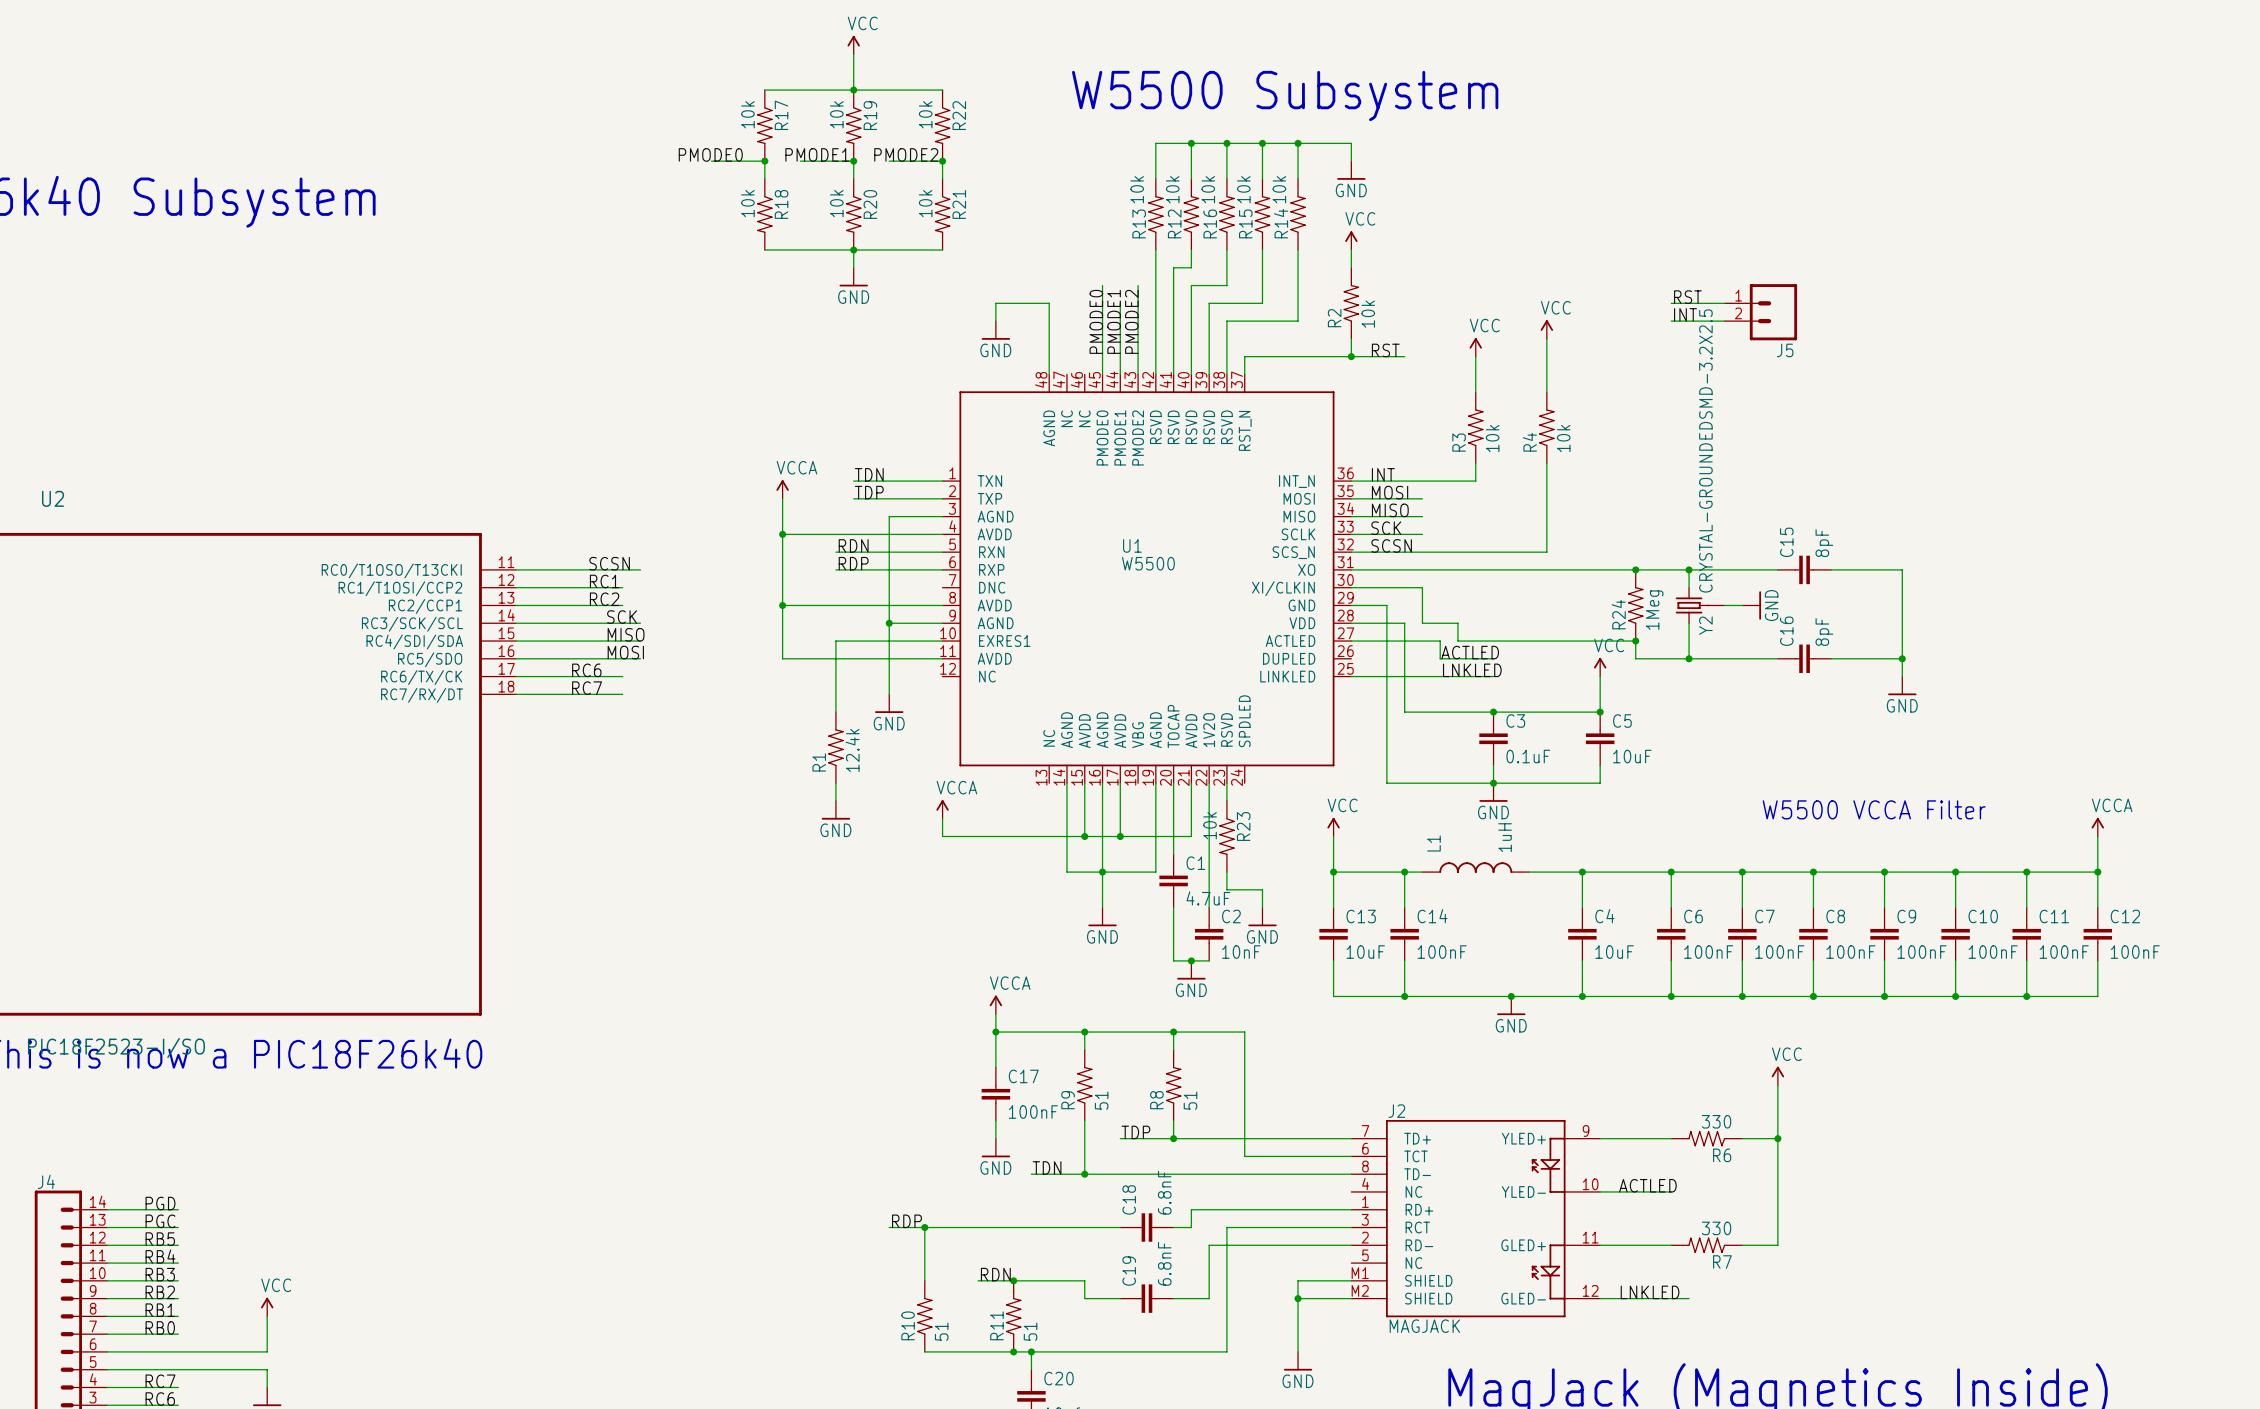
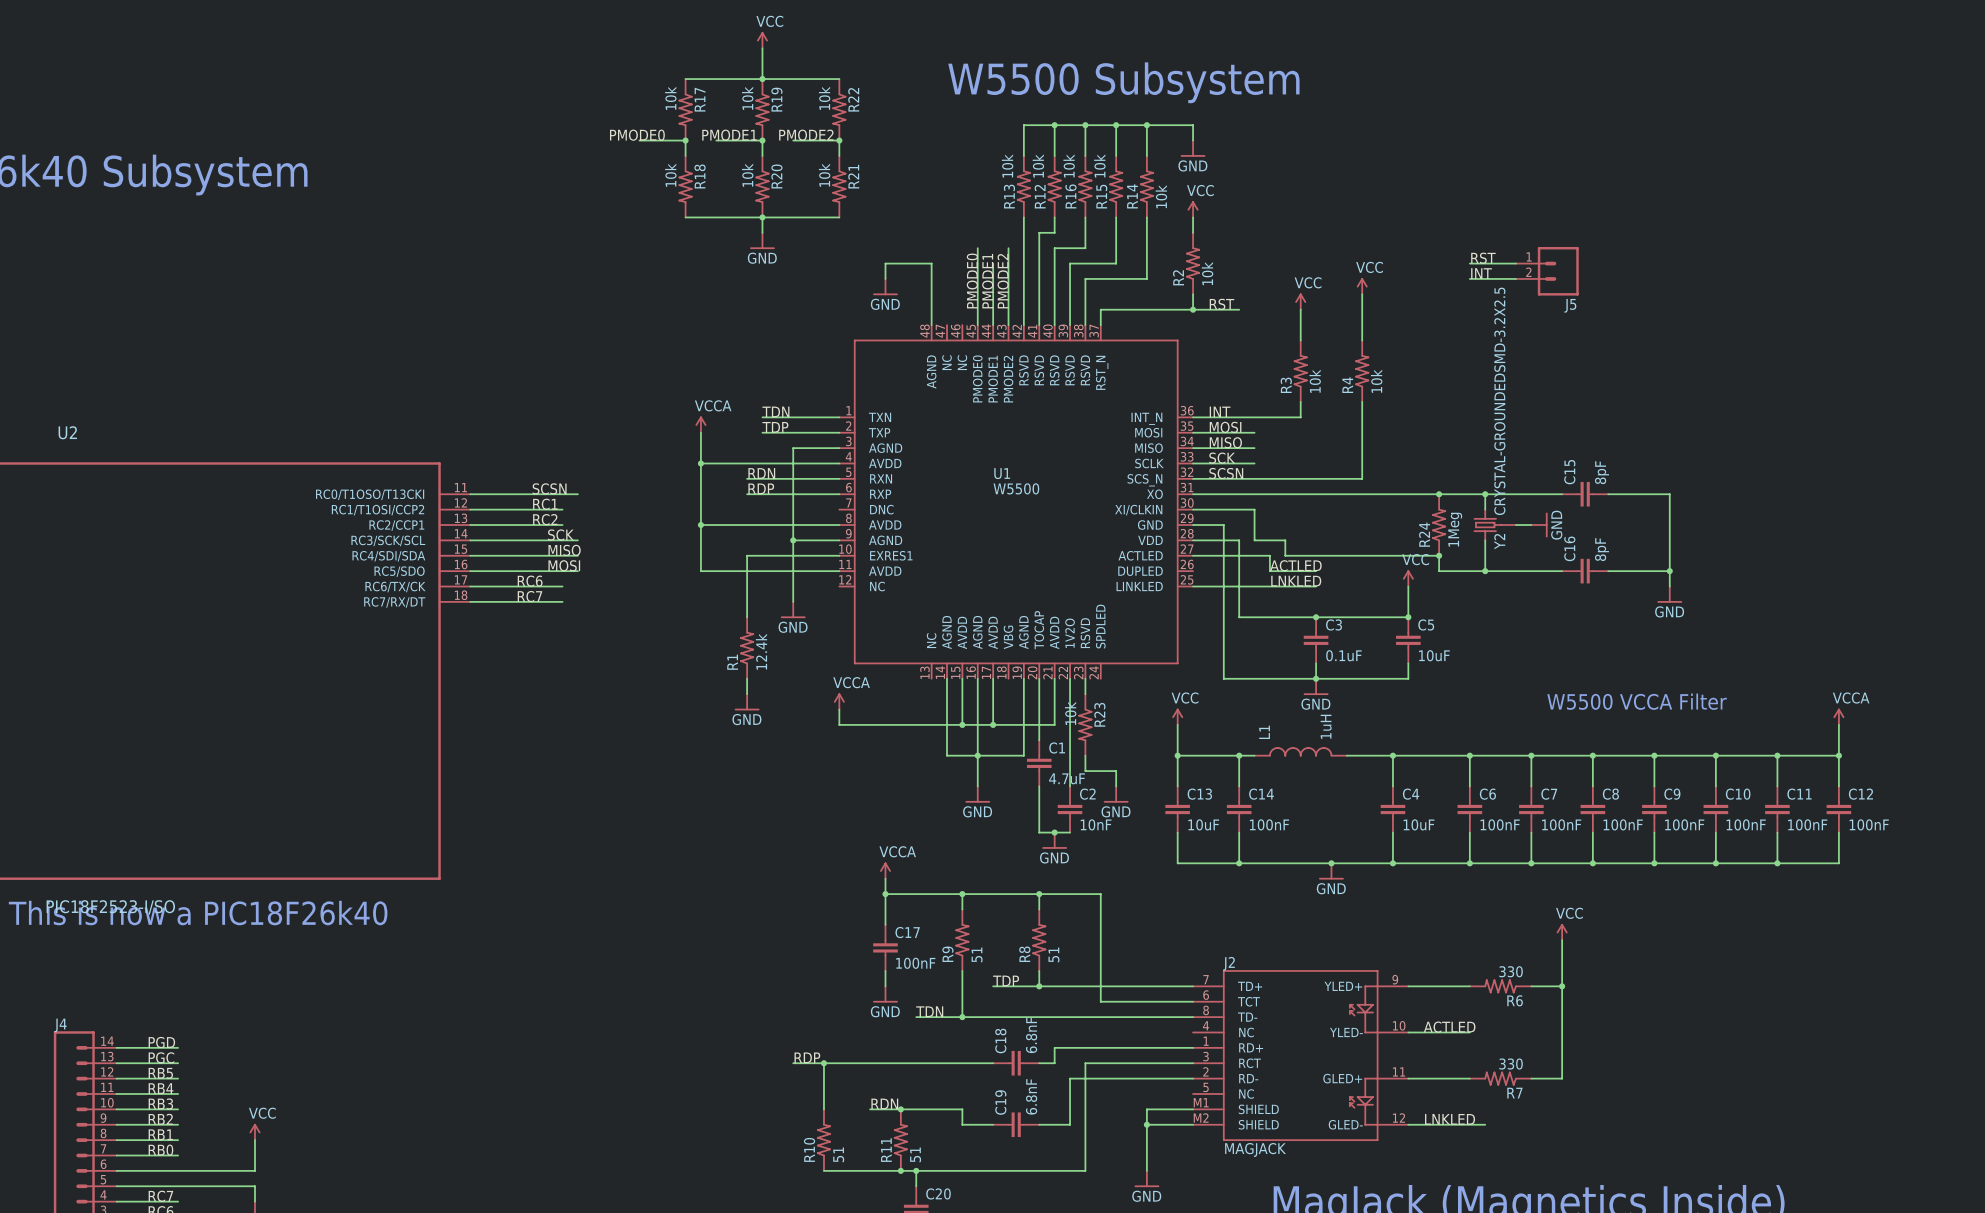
R14 value position: 10k (1279, 189) -> 10k (1161, 196)

